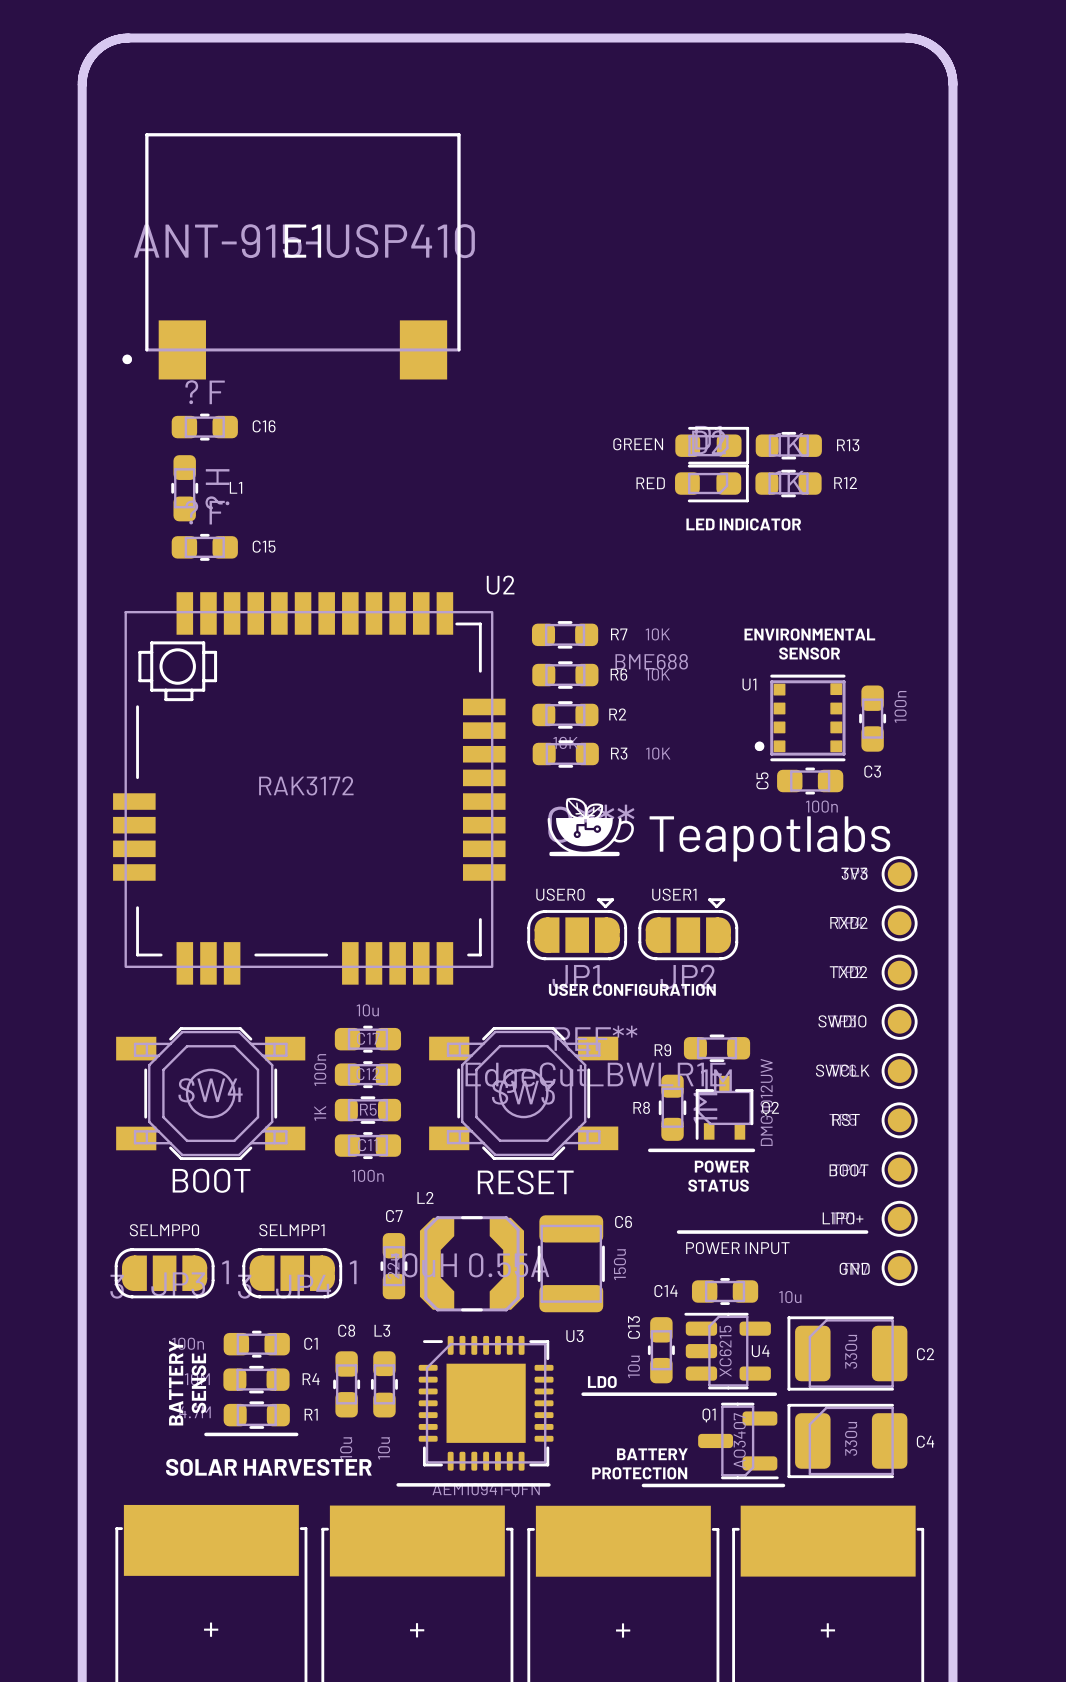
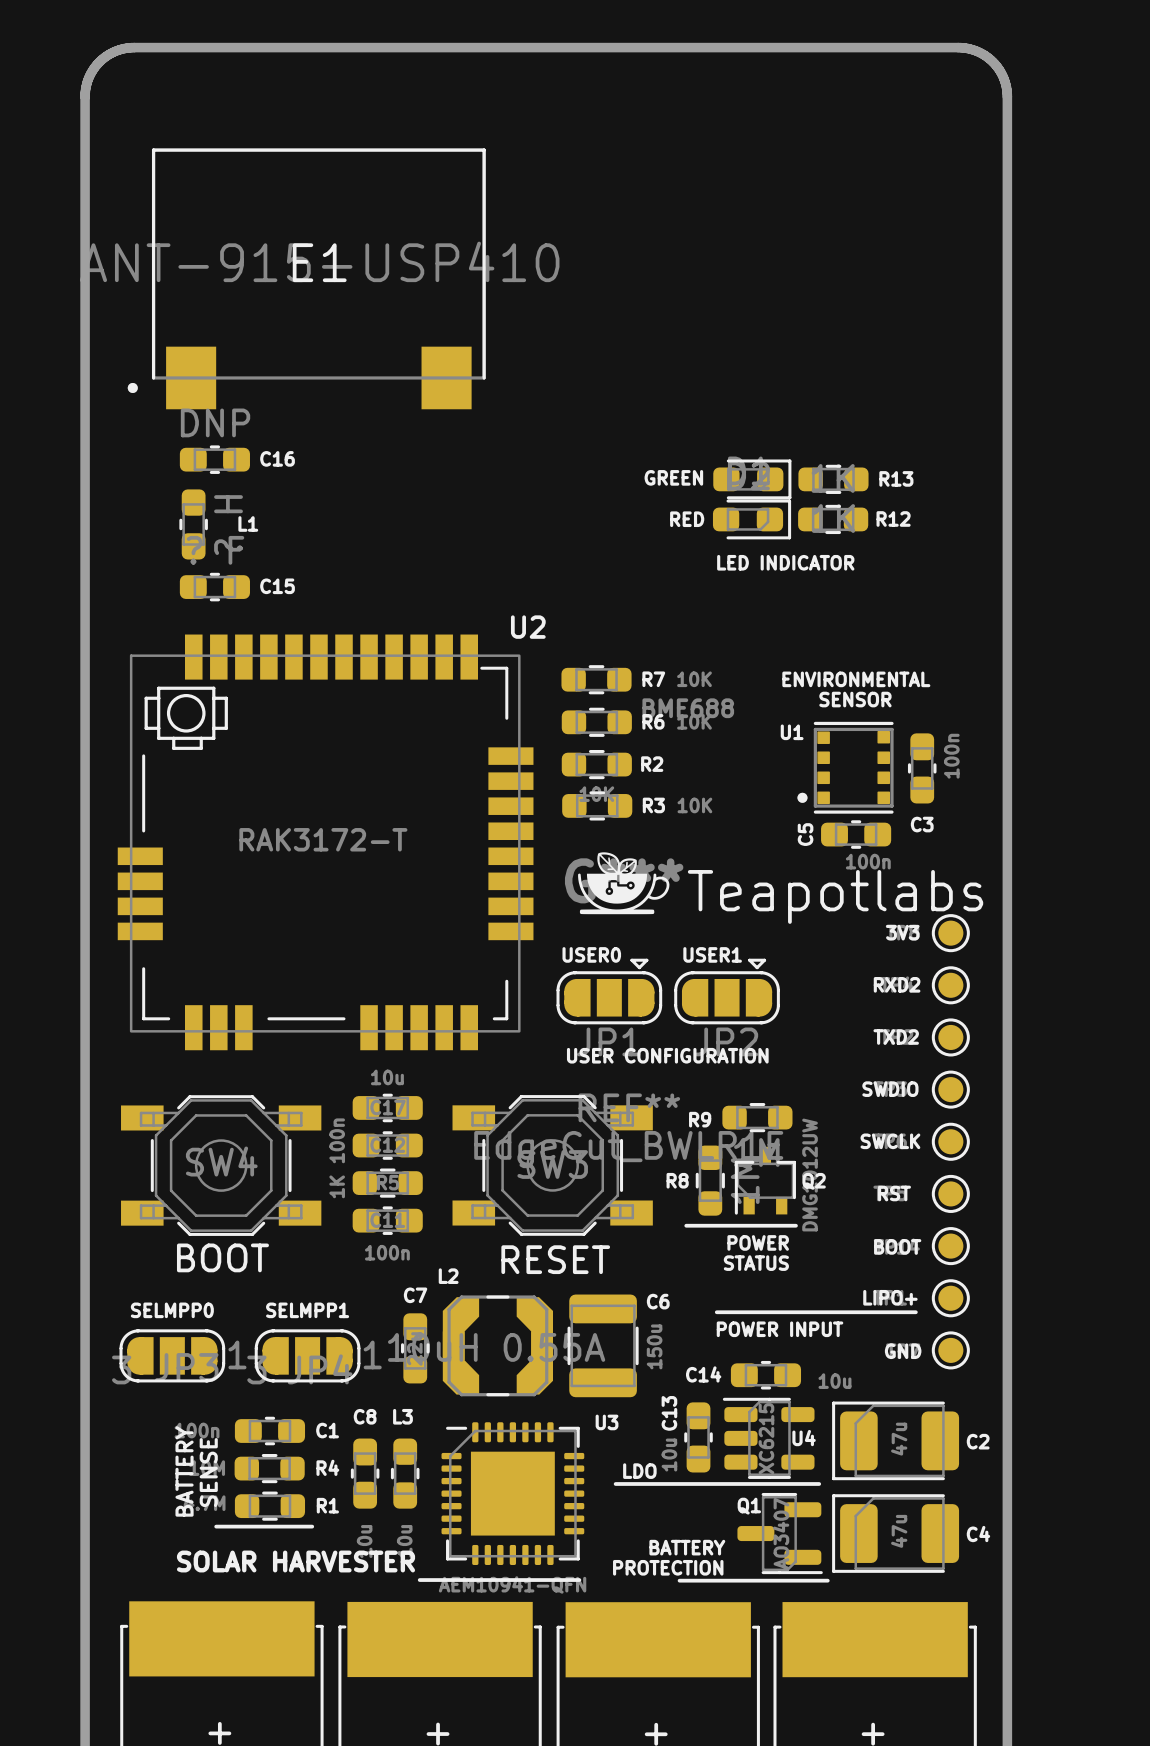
C16 value: ? F (205, 392) -> DNP (215, 422)
U2 value: RAK3172 (306, 785) -> RAK3172-T (323, 839)
C2 value: 330u (851, 1351) -> 47u (899, 1439)
C4 value: 330u (851, 1438) -> 47u (899, 1531)

